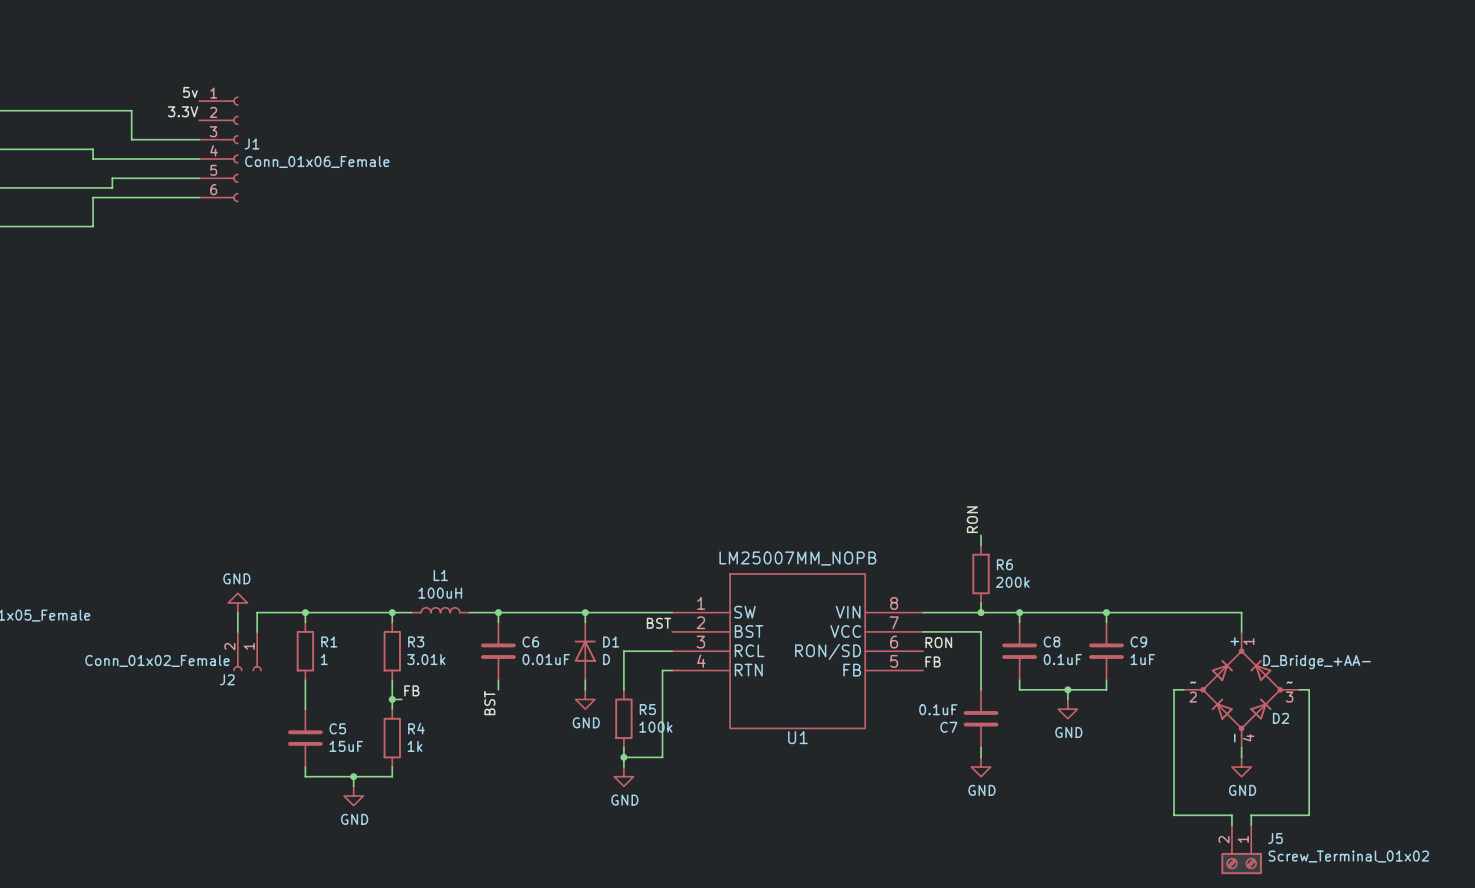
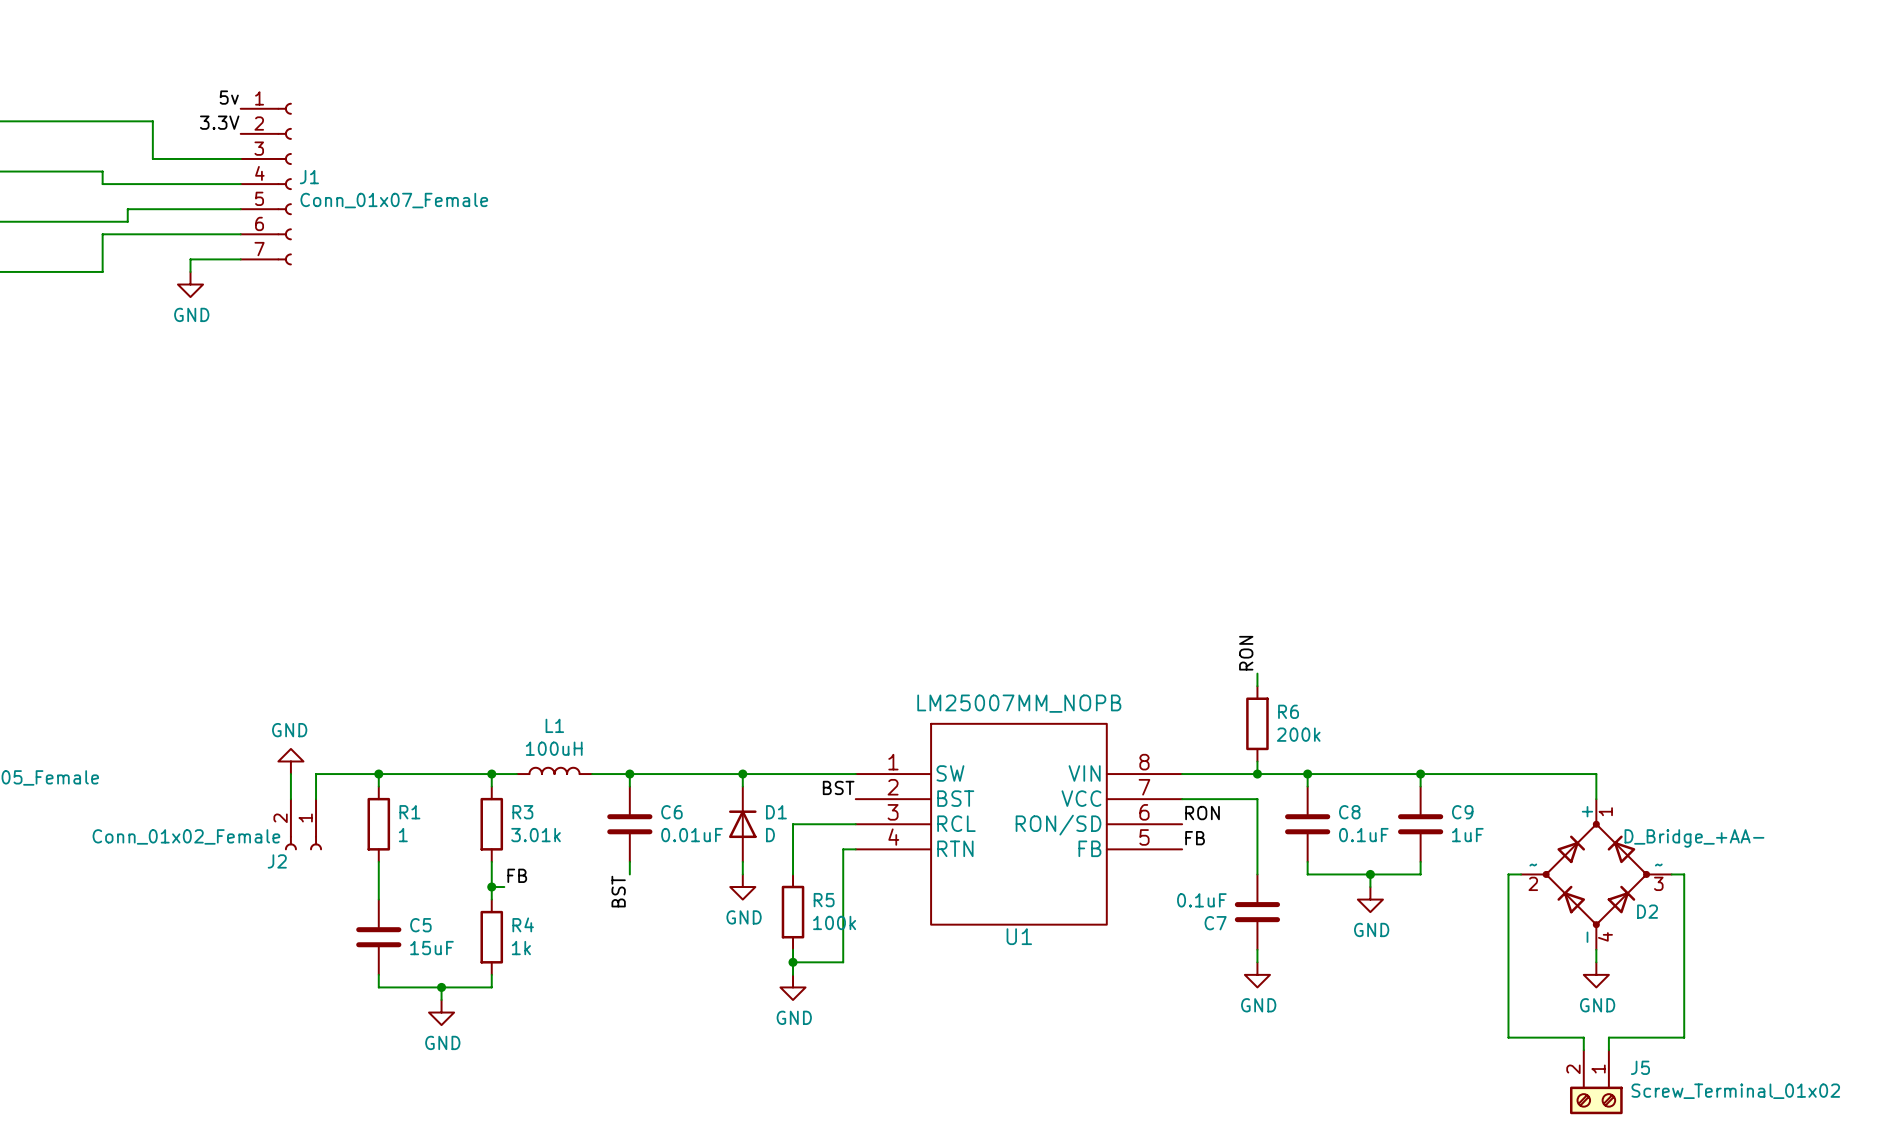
J1 symbol: [199, 96, 239, 203] -> [240, 103, 292, 266]
J1 value: Conn_01x06_Female (317, 161) -> Conn_01x07_Female (394, 200)
wire: none -> (240, 259) (190, 259) (190, 271)
power symbol: none -> GND (190, 284)

